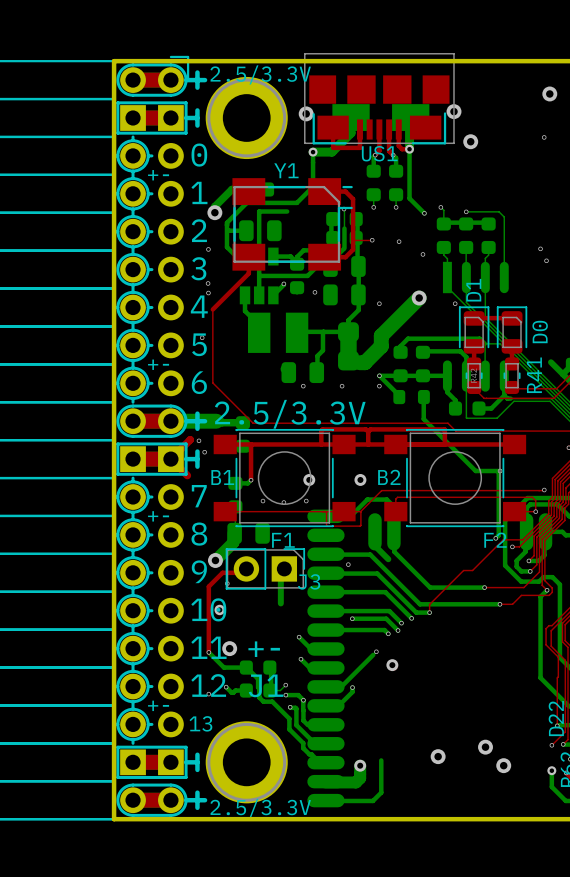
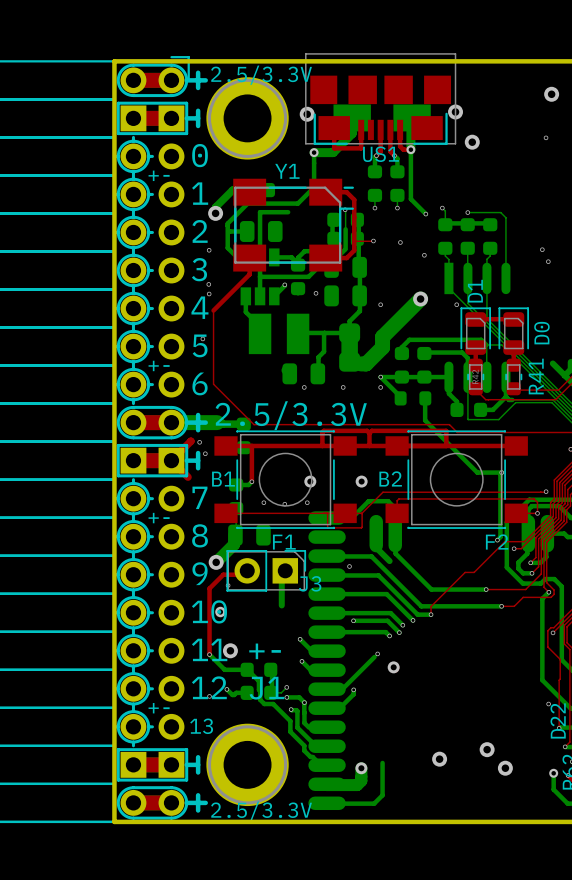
top track: (551, 630) (551, 646) (565, 660) (565, 731) (551, 745) -> none
via: none -> (553, 632)
via position: (551, 745) -> (548, 704)

